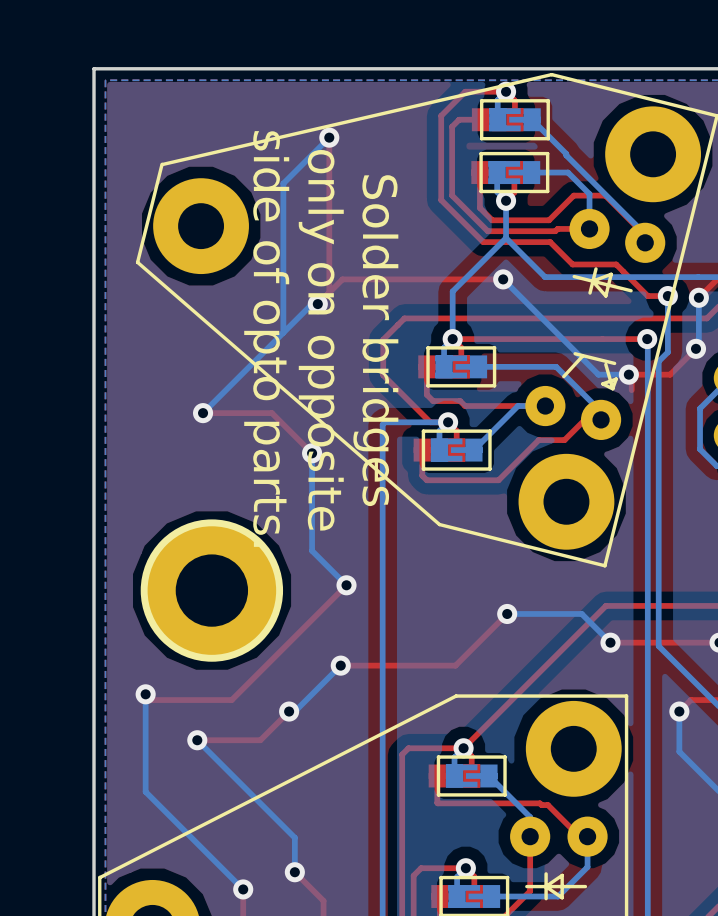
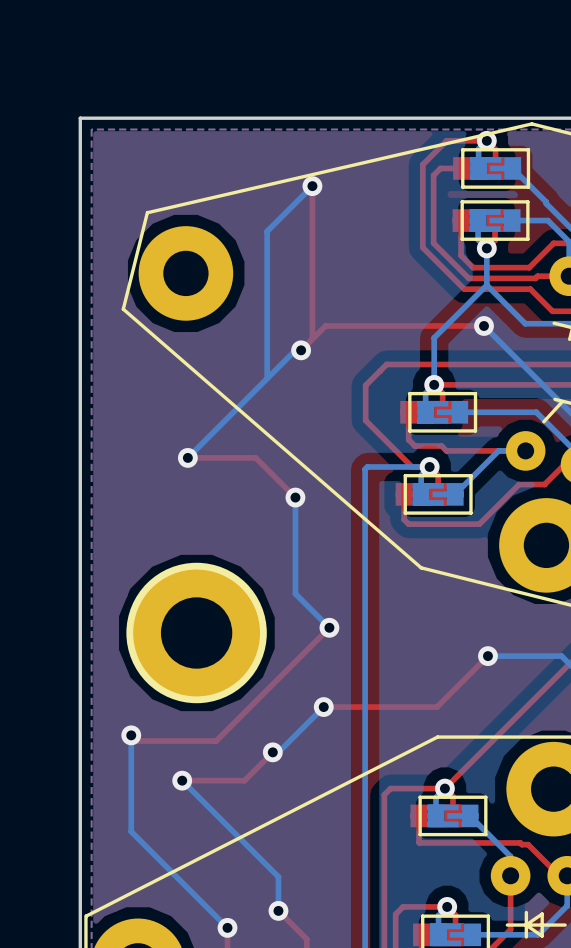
text: side of opto parts. (266, 338) -> none
text: only on opposite (321, 340) -> none
text: Solder bridges (375, 340) -> none

